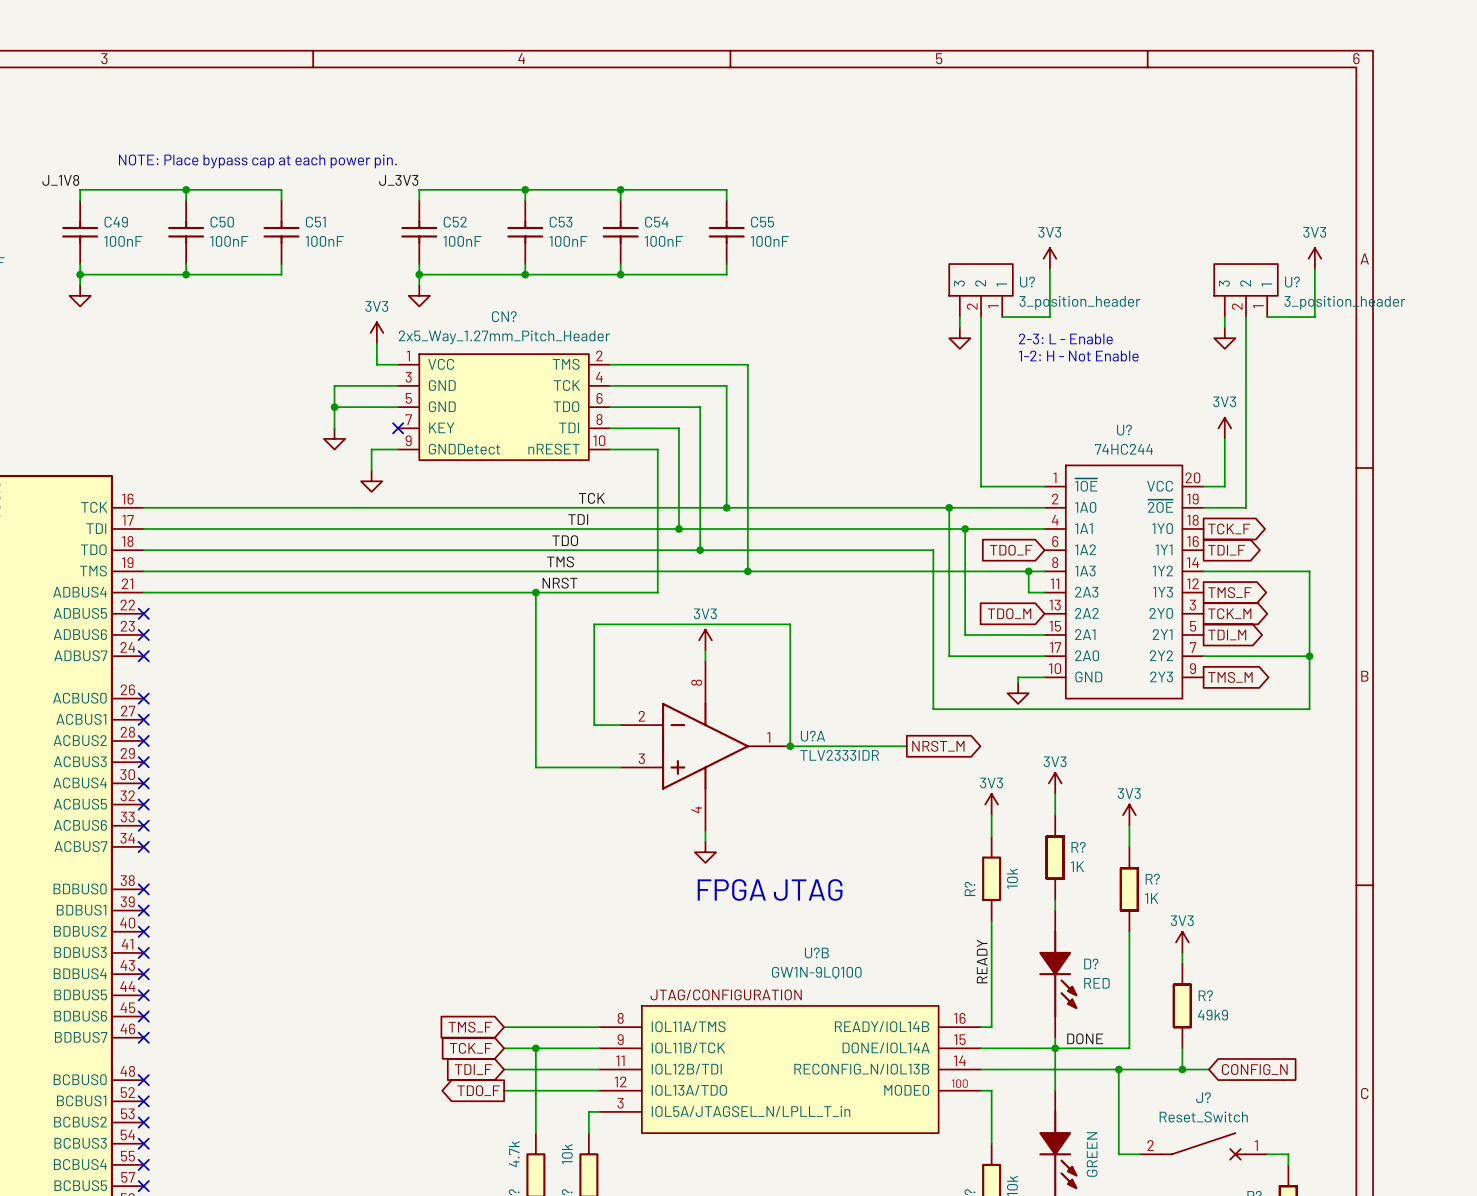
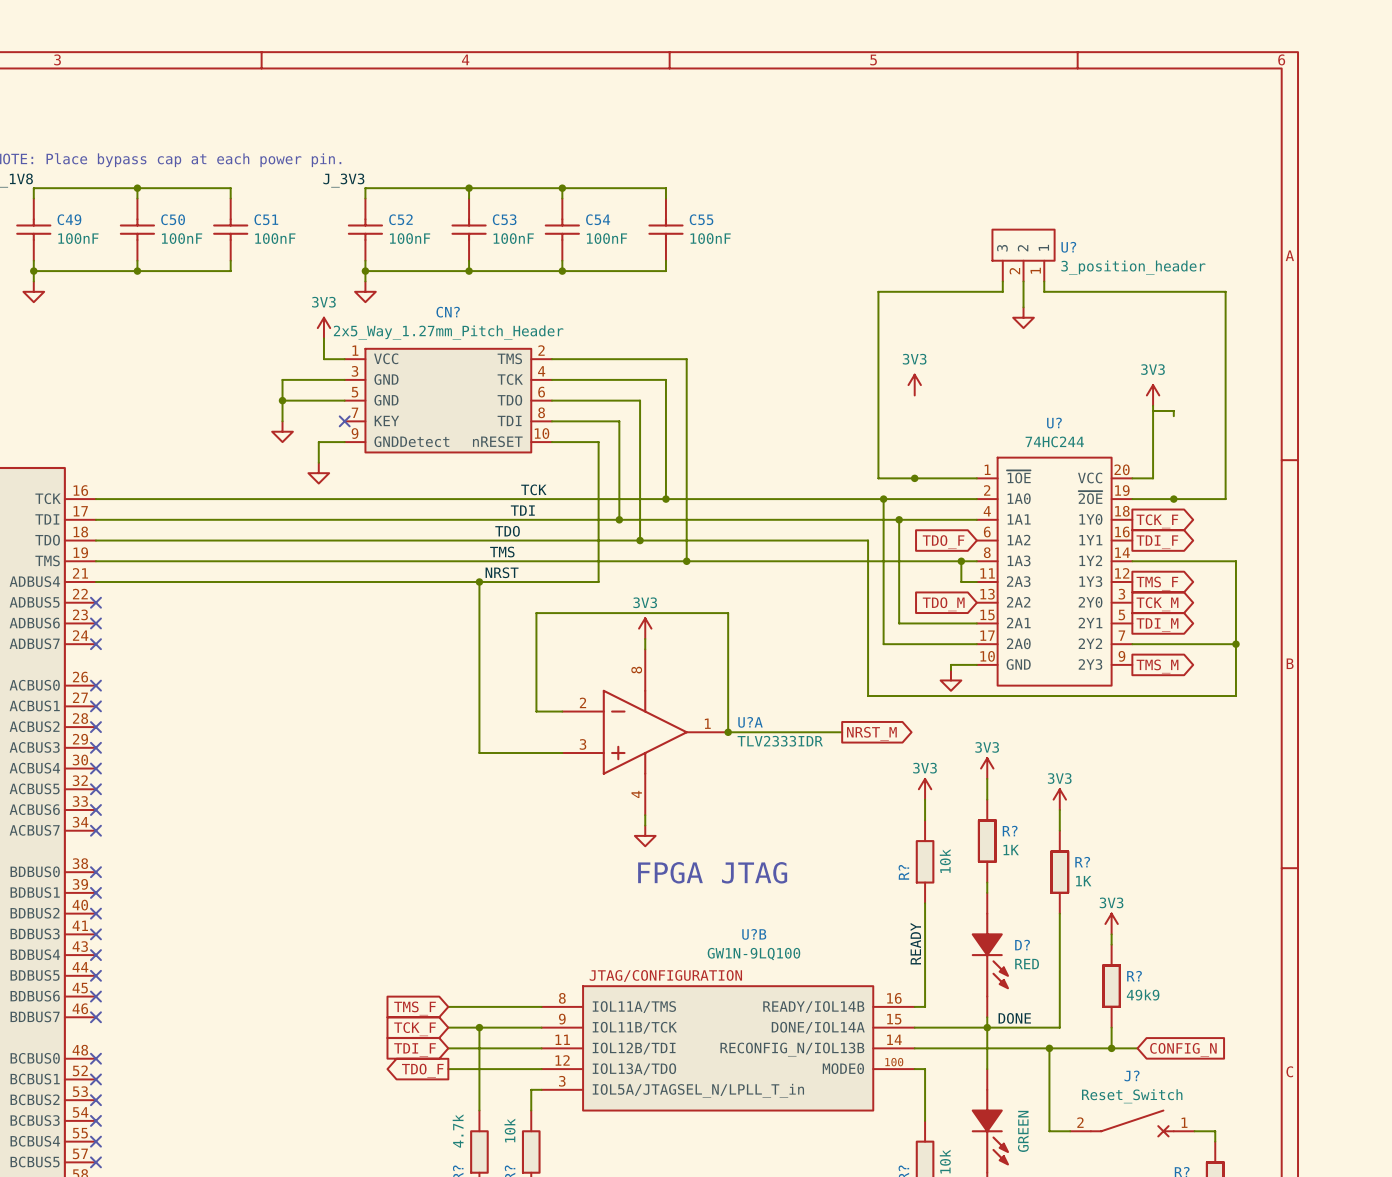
power symbol: 3V3 (1049, 258) -> none
U?: none -> 3_position_header (1023, 255)
power symbol: 3V3 (1314, 258) -> none
wire: (1049, 269) (1049, 317) (1002, 317) -> none
wire: (1314, 269) (1314, 317) (1267, 317) -> none
wire: none -> (1023, 281) (1023, 307)
U?: 3_position_header (981, 290) -> none
U?: 3_position_header (1245, 290) -> none
wire: (959, 317) (959, 327) -> none
wire: (981, 317) (981, 486) -> (1002, 281) (1002, 291) (878, 291) (878, 478) (914, 478)
wire: (1224, 317) (1224, 327) -> none
wire: (1245, 317) (1245, 417) -> (1153, 410) (1173, 410)
power symbol: none -> (1023, 317)
power symbol: (959, 338) -> none
text: 2-3: L - Enable (1065, 338) -> none
power symbol: (1224, 338) -> none
text: 1-2: H - Not Enable (1078, 356) -> none
power symbol: none -> 3V3 (914, 385)
wire: (1245, 423) (1245, 507) -> (1044, 281) (1044, 291) (1225, 291) (1225, 499) (1173, 499)
power symbol position: 3V3 (1224, 428) -> 3V3 (1153, 395)
junction: none -> (914, 478)
junction: none -> (1173, 499)

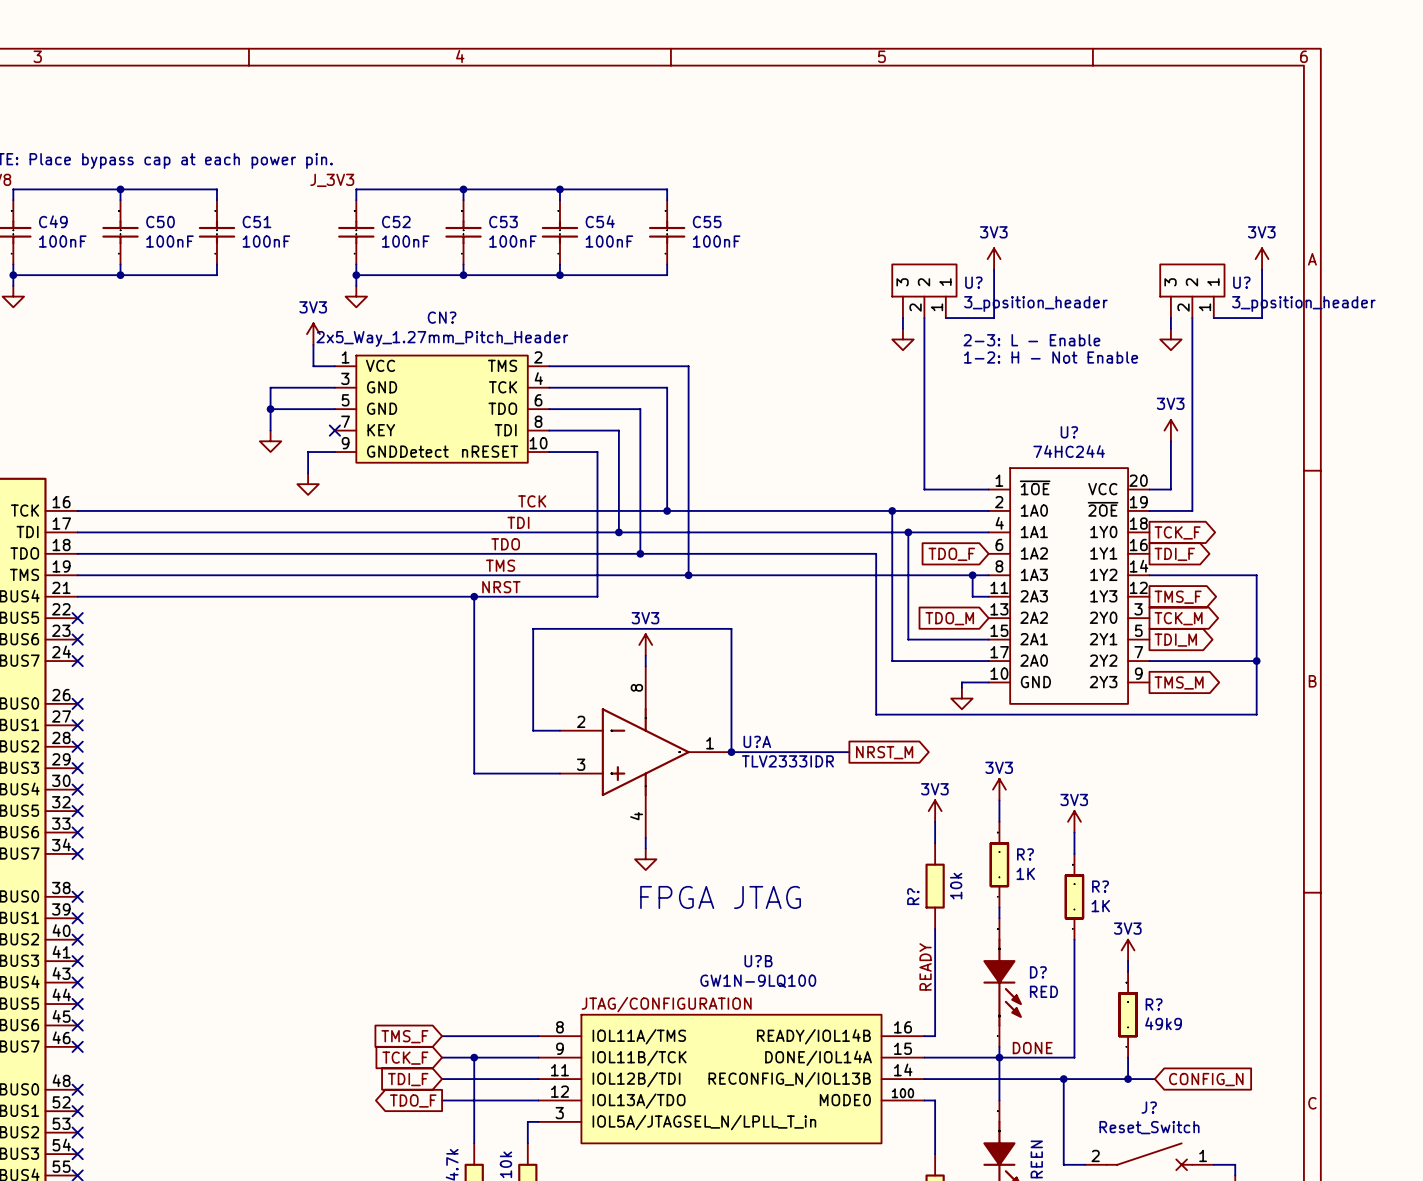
power symbol: none -> 3V3 (994, 259)
U?: 3_position_header (1023, 255) -> none
power symbol: none -> 3V3 (1262, 259)
wire: none -> (994, 269) (994, 318) (945, 318)
wire: none -> (1262, 269) (1262, 318) (1213, 318)
wire: (1002, 281) (1002, 291) (878, 291) (878, 478) (914, 478) -> (924, 318) (924, 489)
wire: (1023, 281) (1023, 307) -> none
wire: (1044, 281) (1044, 291) (1225, 291) (1225, 499) (1173, 499) -> (1192, 425) (1192, 510)
U?: none -> 3_position_header (924, 291)
U?: none -> 3_position_header (1192, 291)
wire: none -> (902, 318) (902, 328)
wire: none -> (1170, 318) (1170, 328)
power symbol: (1023, 317) -> none
power symbol: none -> (902, 339)
text: none -> 2-3: L - Enable (1031, 340)
power symbol: none -> (1170, 339)
text: none -> 1-2: H - Not Enable (1051, 357)
power symbol: 3V3 (914, 385) -> none
power symbol position: 3V3 (1153, 395) -> 3V3 (1170, 430)
wire: (1153, 410) (1173, 410) -> (1192, 318) (1192, 419)
junction: (914, 478) -> none
junction: (1173, 499) -> none

